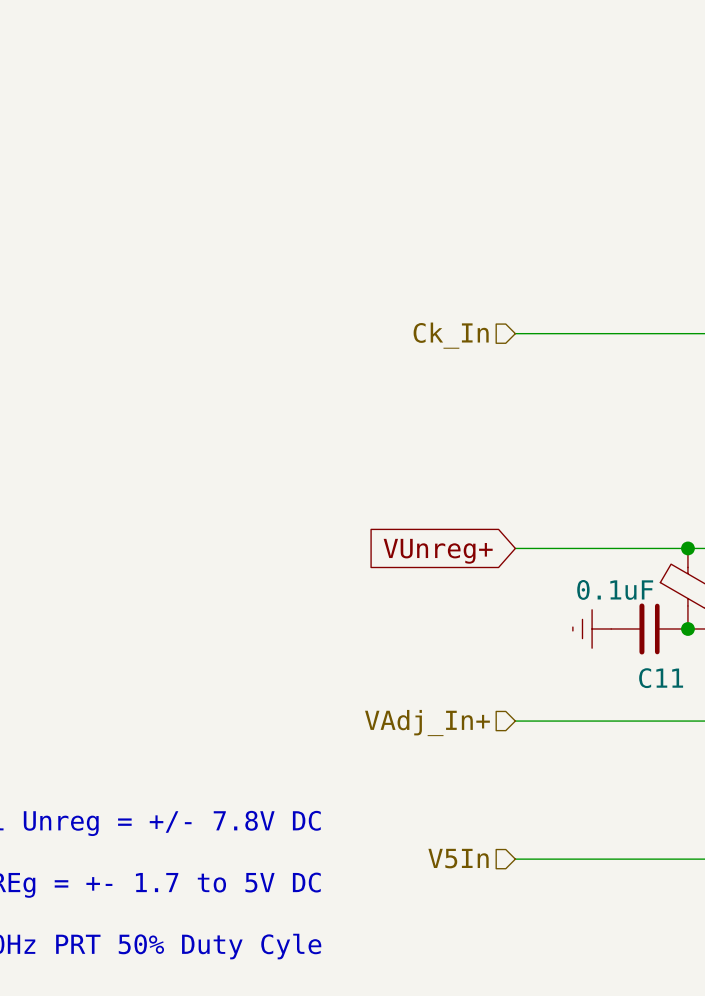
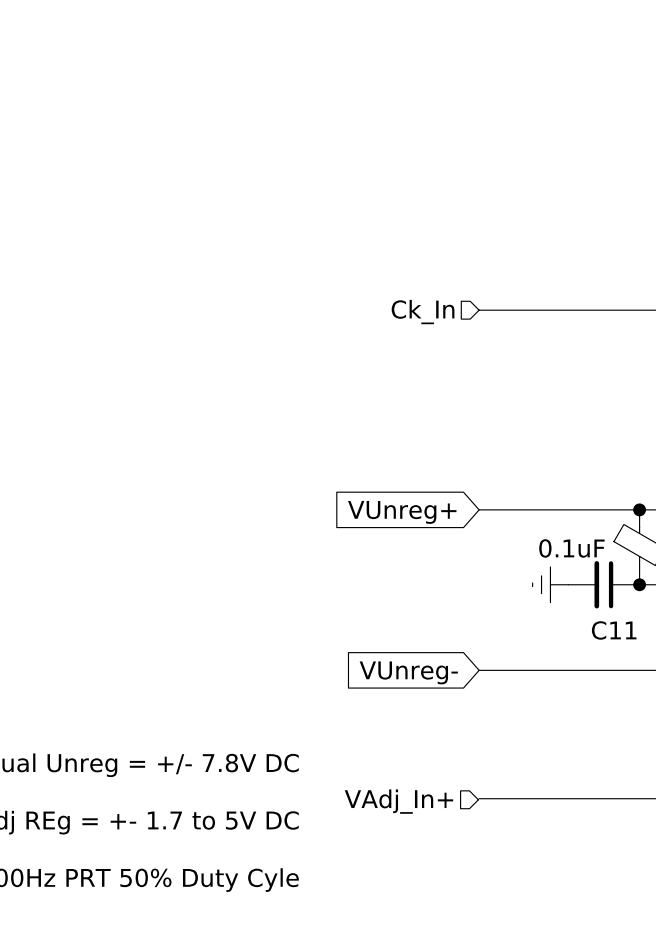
hierarchical label: VAdj_In+ (427, 723) -> none
global label: none -> VUnreg- (408, 672)
hierarchical label: V5In (458, 858) -> VAdj_In+ (398, 801)

